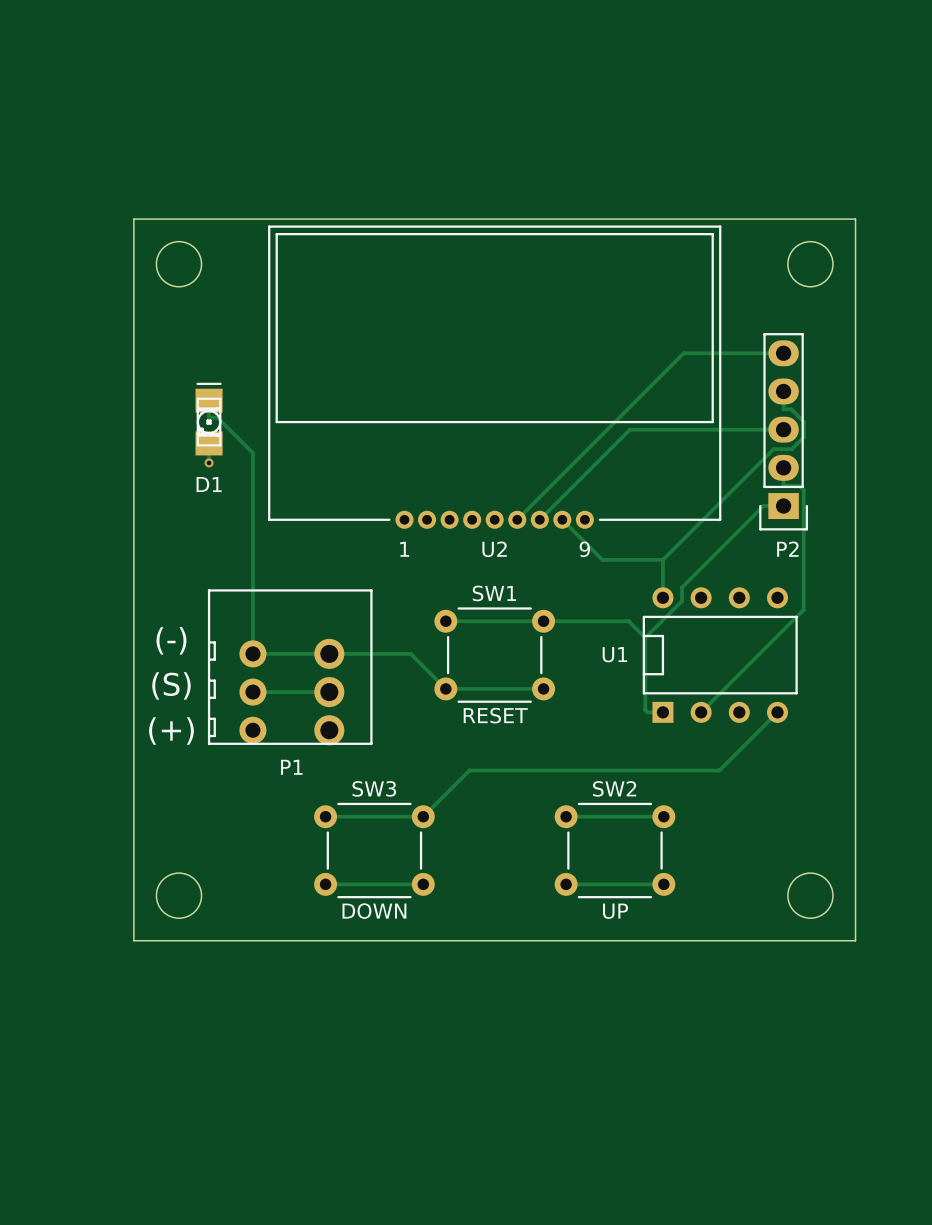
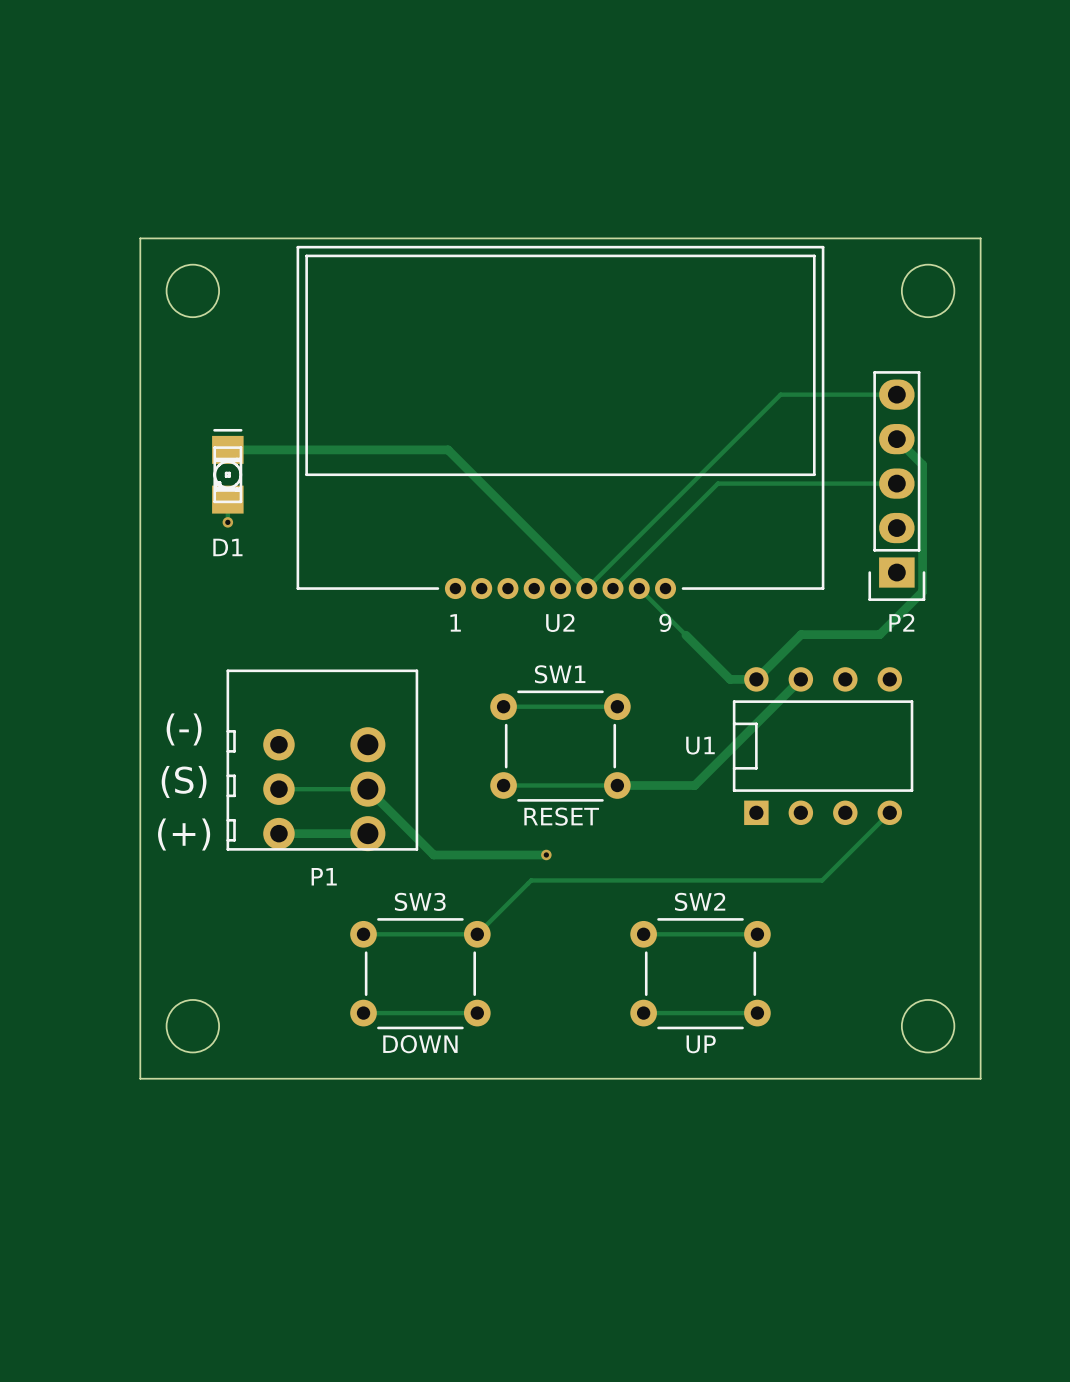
track: (783, 391) (783, 409) (791, 409) (803, 421) (803, 437) (791, 449) (773, 449) (662, 559) -> (896, 439) (922, 464) (922, 591) (879, 634) (801, 634) (756, 679) (730, 679) (685, 635)
track: (209, 400) (209, 417) (217, 417) (252, 453) (252, 653) (410, 653) (445, 688) -> (227, 449) (448, 449) (586, 588)
track: (783, 467) (783, 485) (799, 485) (803, 490) (803, 609) (701, 712) -> none
track: (783, 506) (763, 506) (682, 587) (682, 601) (645, 637) -> none
track: (602, 559) (662, 559) -> none
track: (662, 559) (662, 597) -> none
track: none -> (800, 679) (694, 785) (617, 785)
track: (543, 621) (628, 621) (645, 637) -> none
track: (645, 637) (645, 710) (647, 712) (662, 712) -> none
track: none -> (367, 789) (433, 854) (546, 854)
track: none -> (278, 833) (367, 833)
via: none -> (546, 854)

